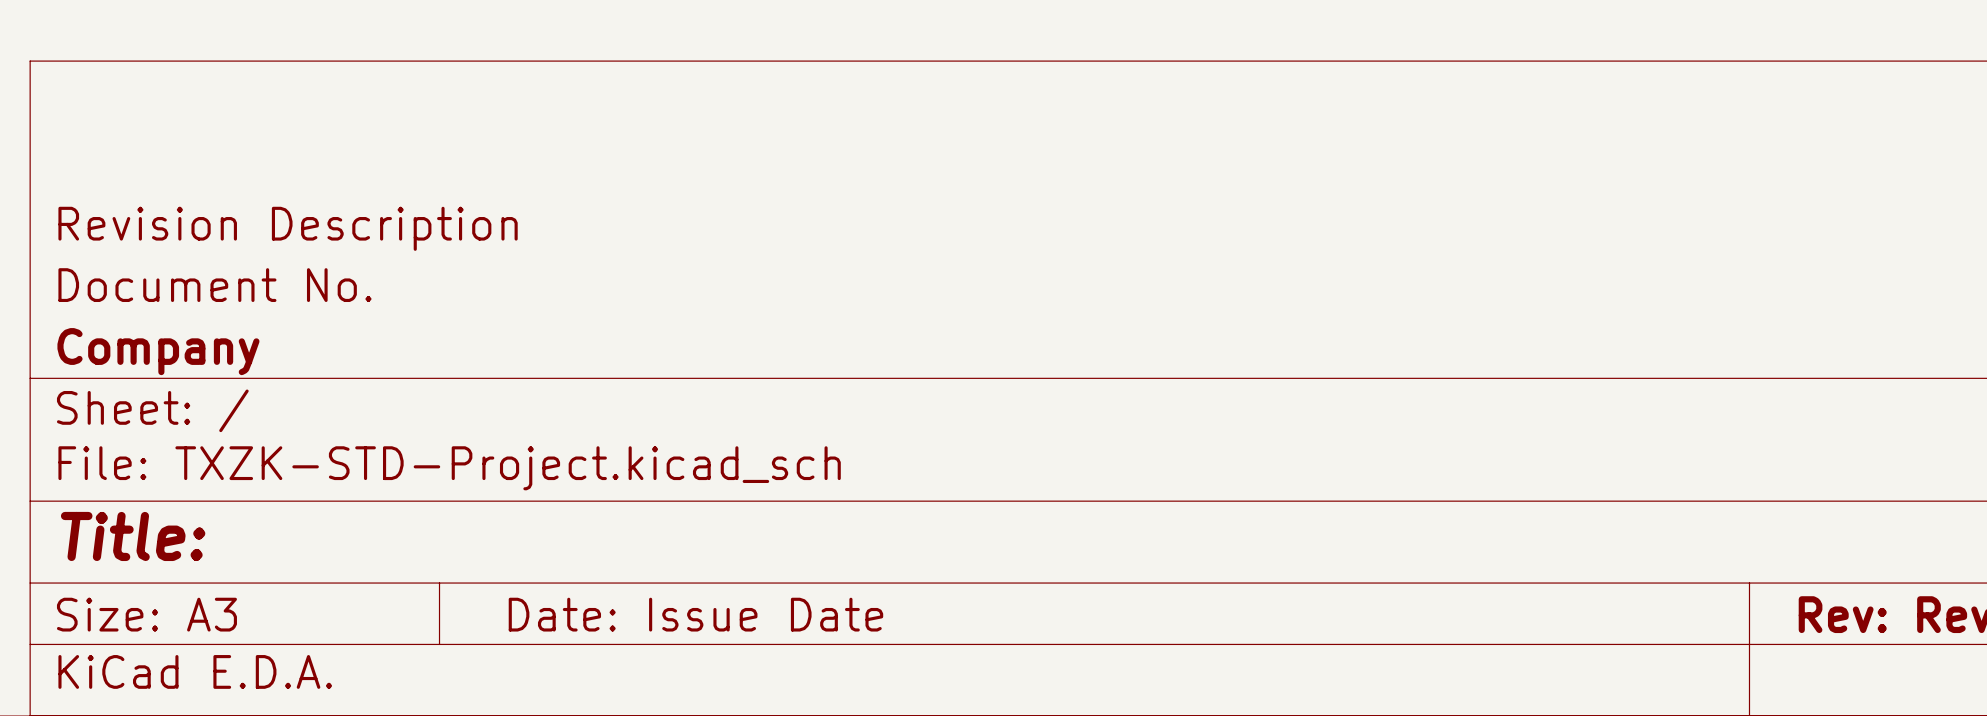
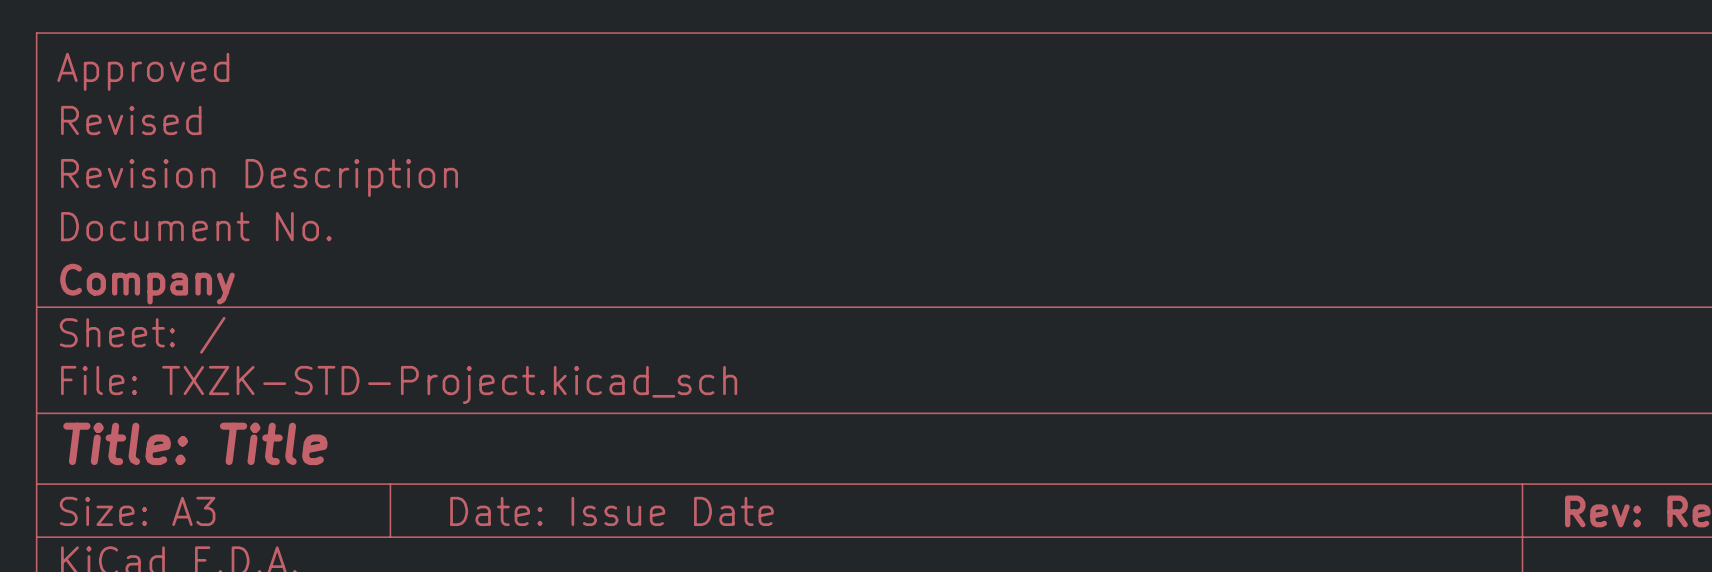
title block: none -> Approved (143, 71)
title block: none -> Revised (131, 120)
title block: Title: (133, 536) -> Title: Title (195, 443)

